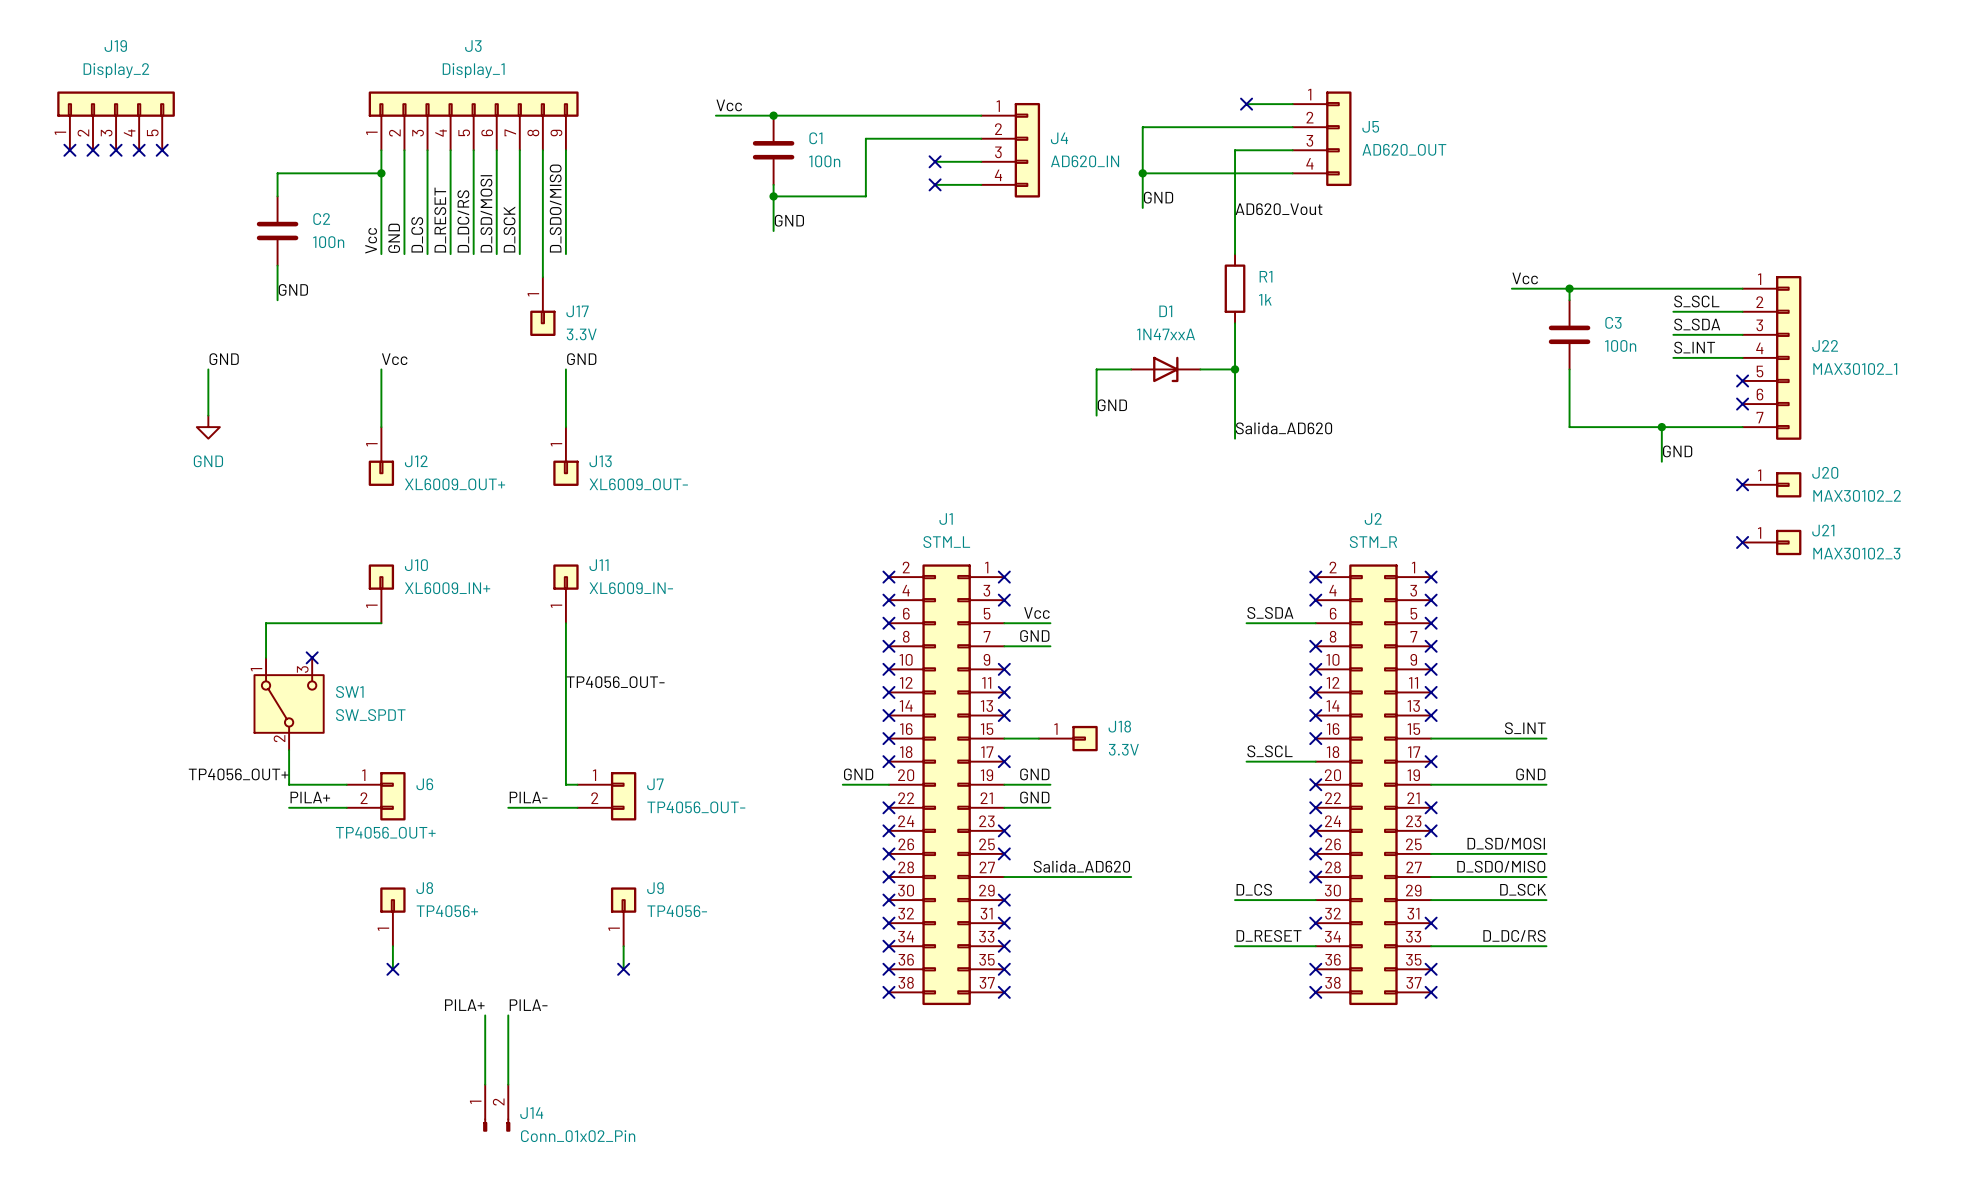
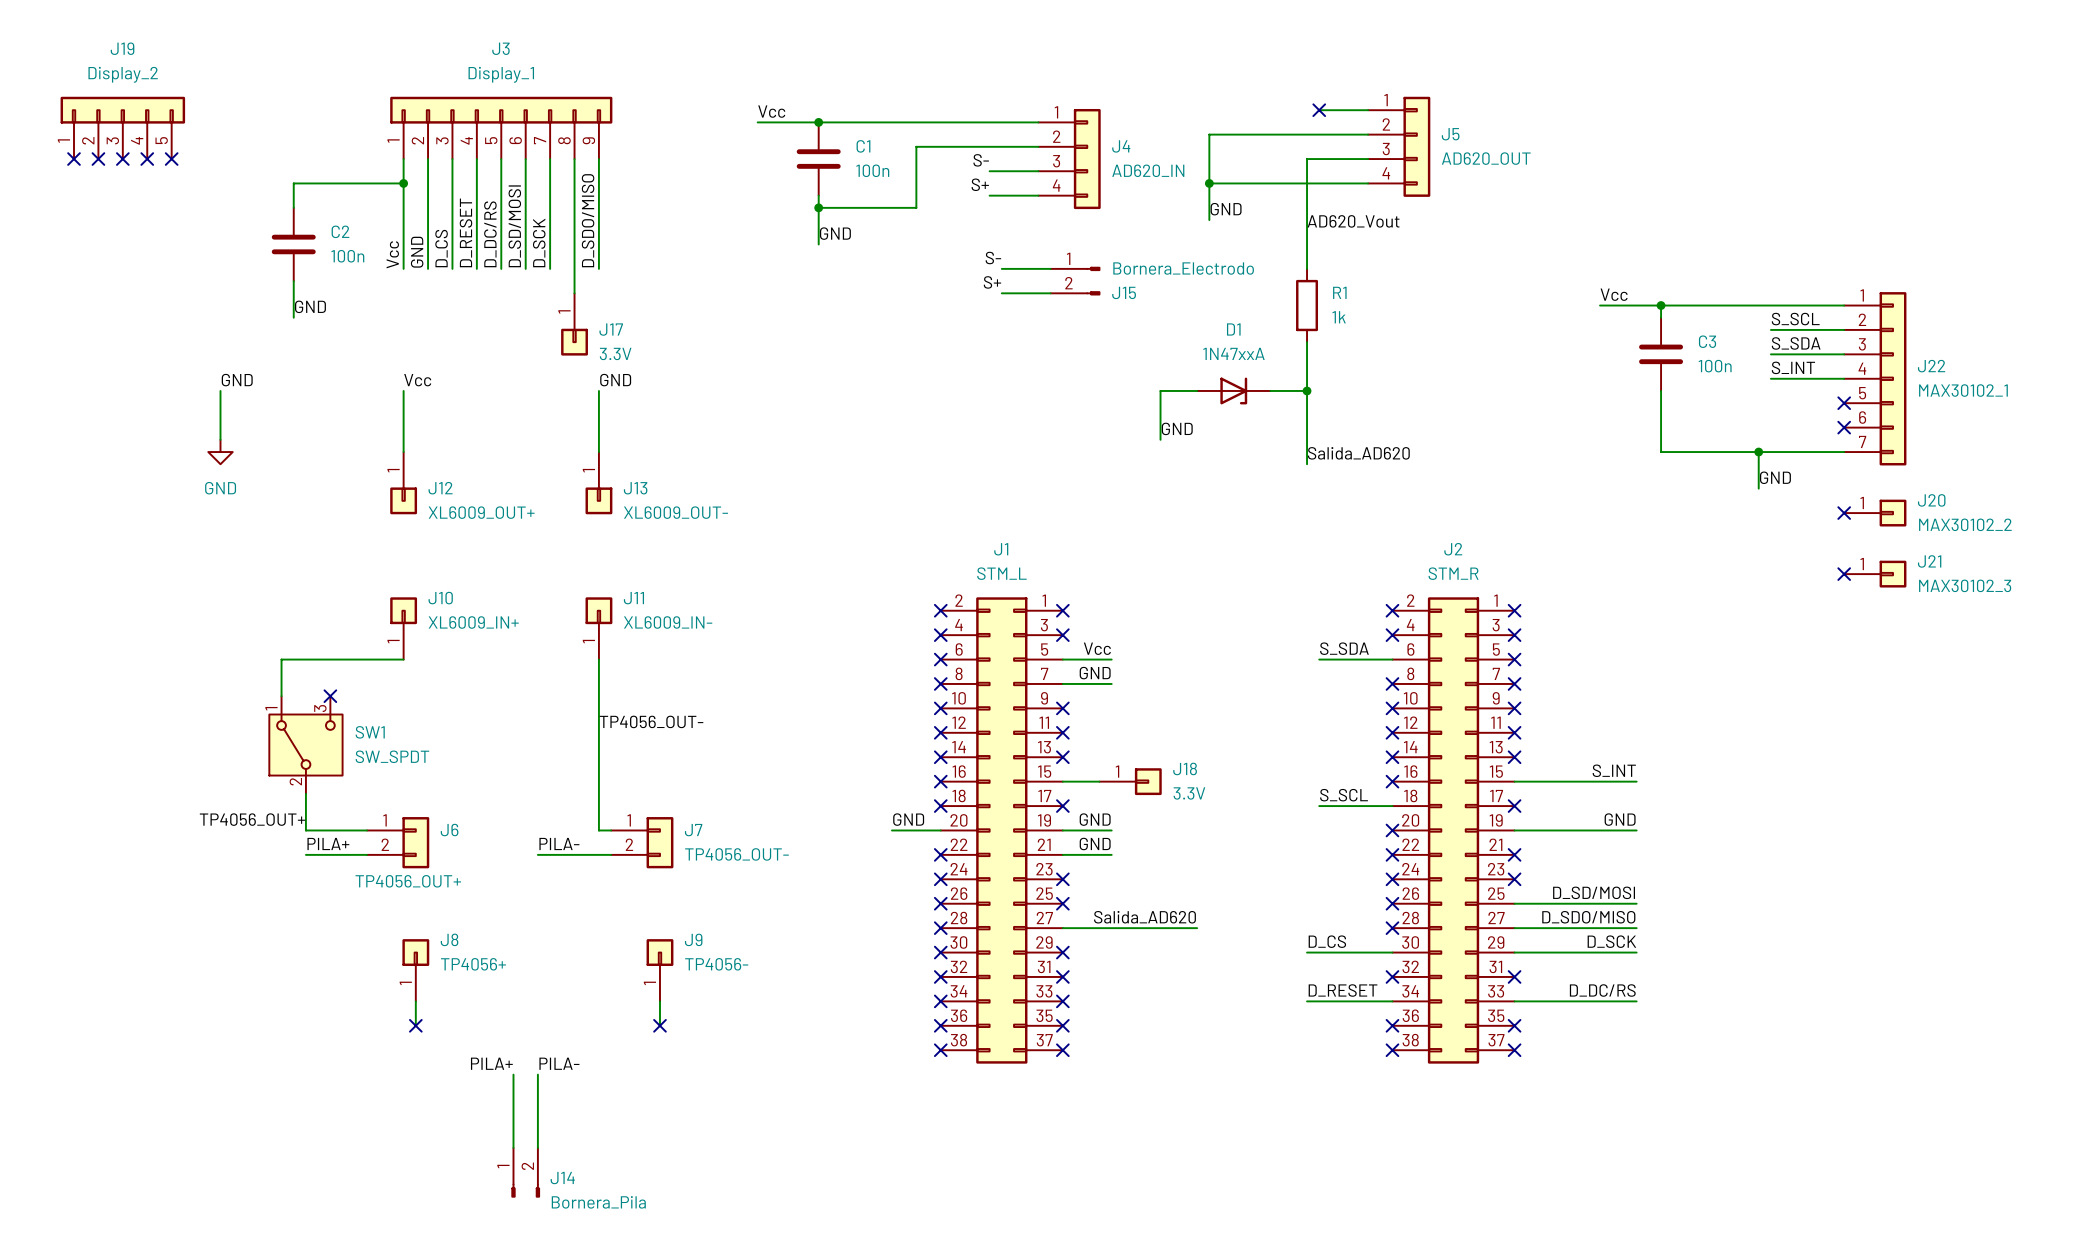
label: none -> S- (981, 160)
no-connect mark: (935, 161) -> none
label: none -> S+ (980, 184)
no-connect mark: (935, 184) -> none
label: none -> S- (993, 258)
wire: none -> (1001, 268) (1050, 268)
J15: none -> Bornera_Electrodo (1075, 281)
label: none -> S+ (992, 282)
wire: none -> (1001, 293) (1050, 293)
J14 value: Conn_01x02_Pin (578, 1136) -> Bornera_Pila (598, 1202)

